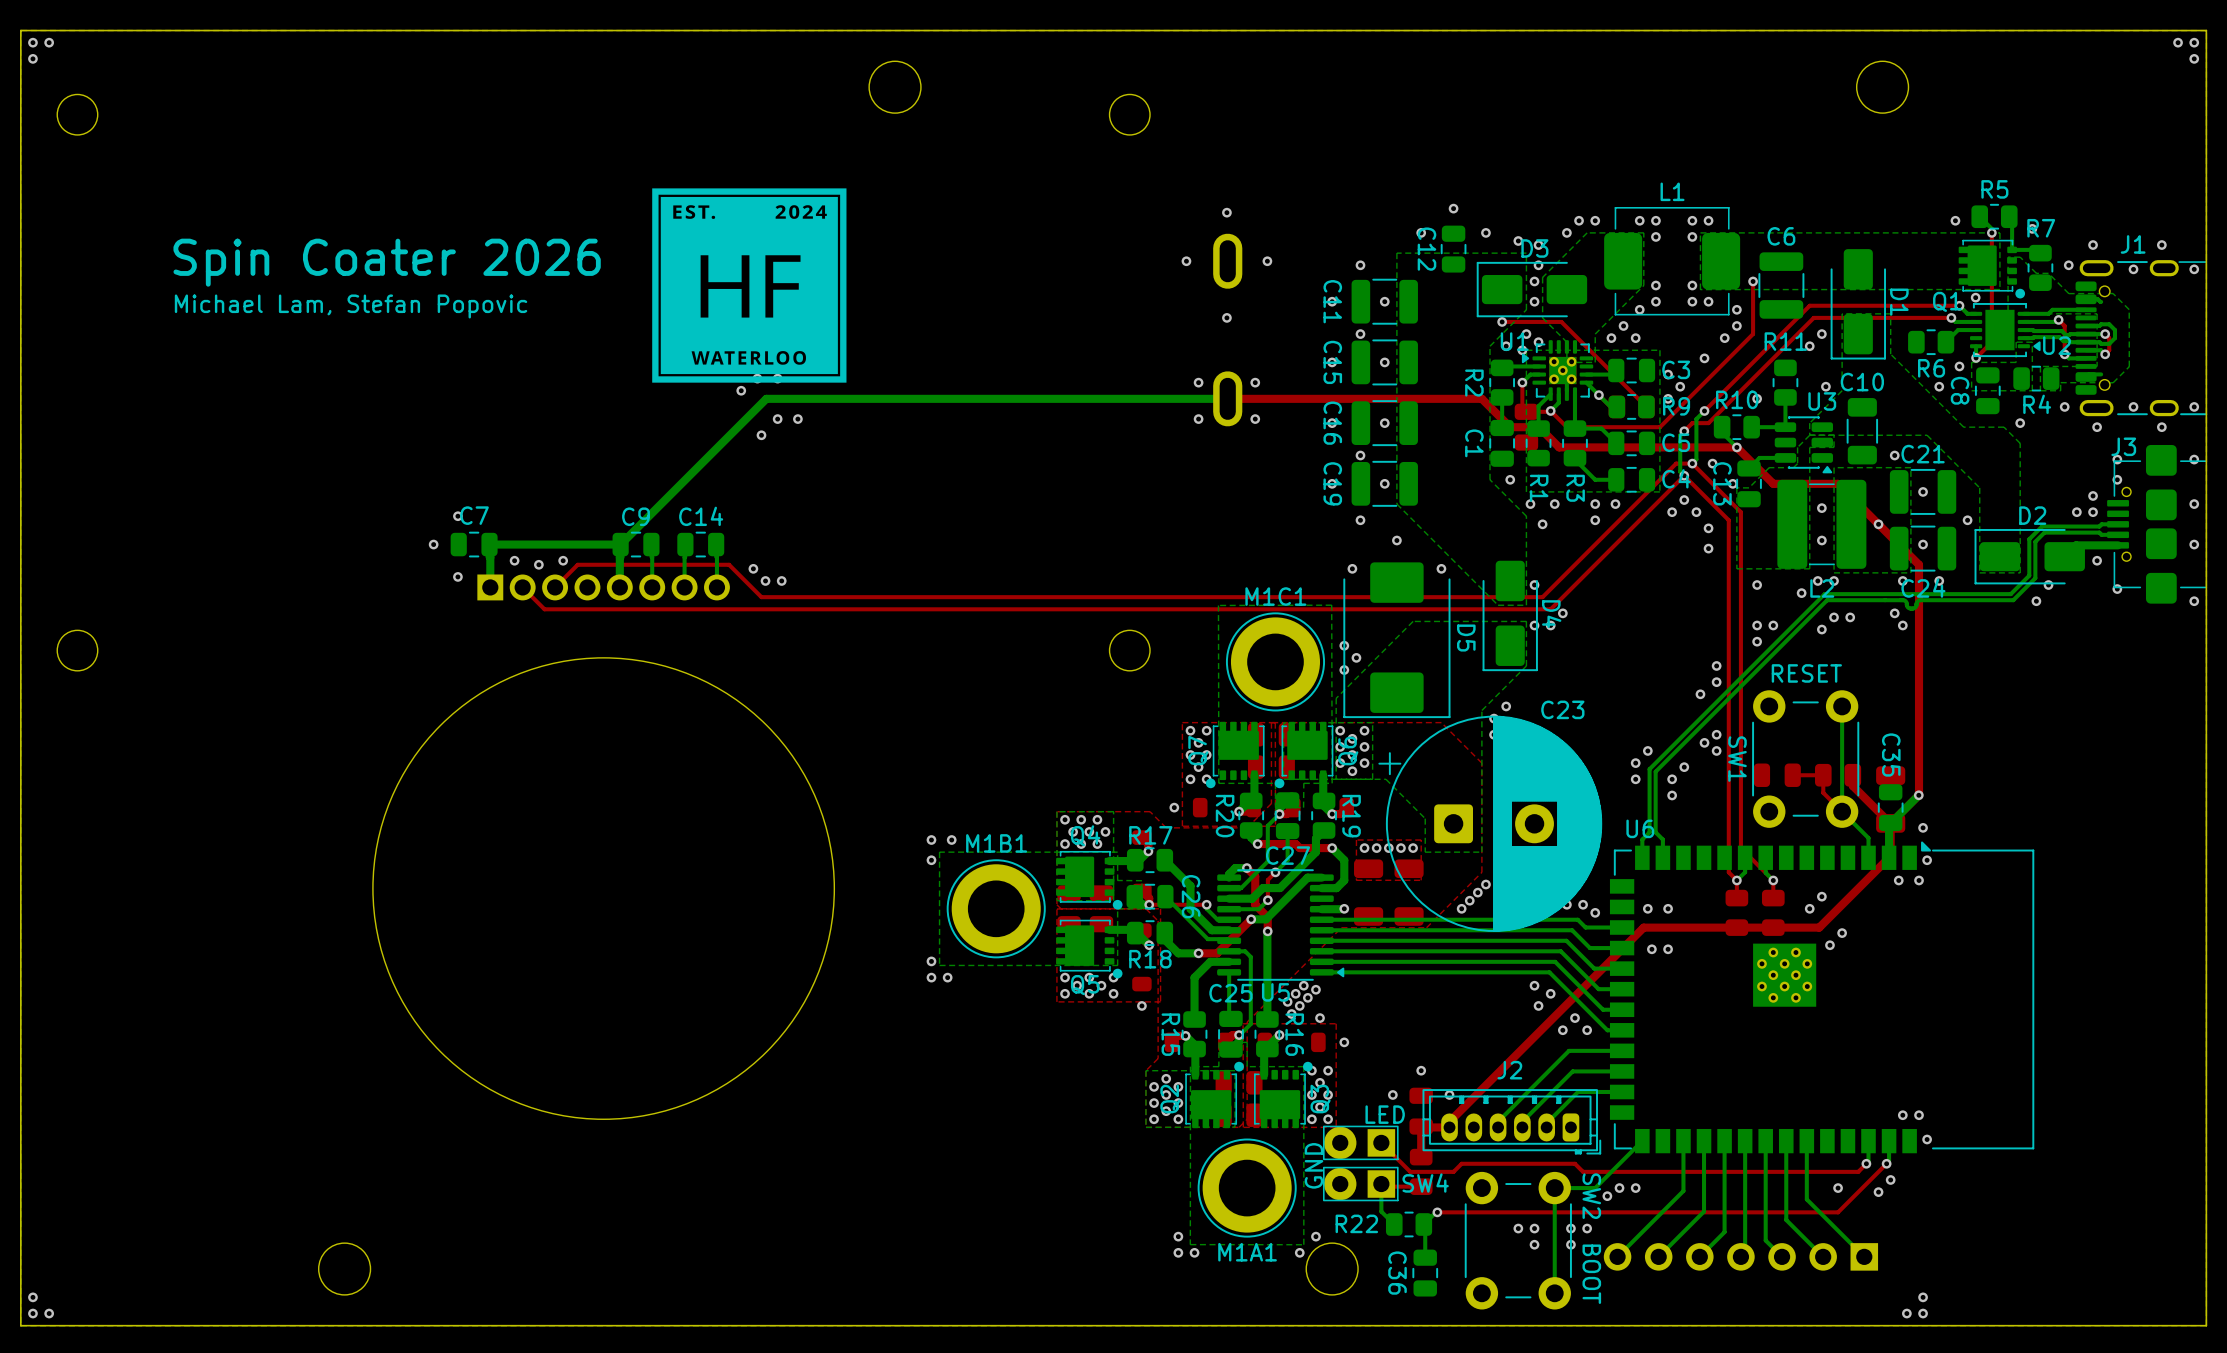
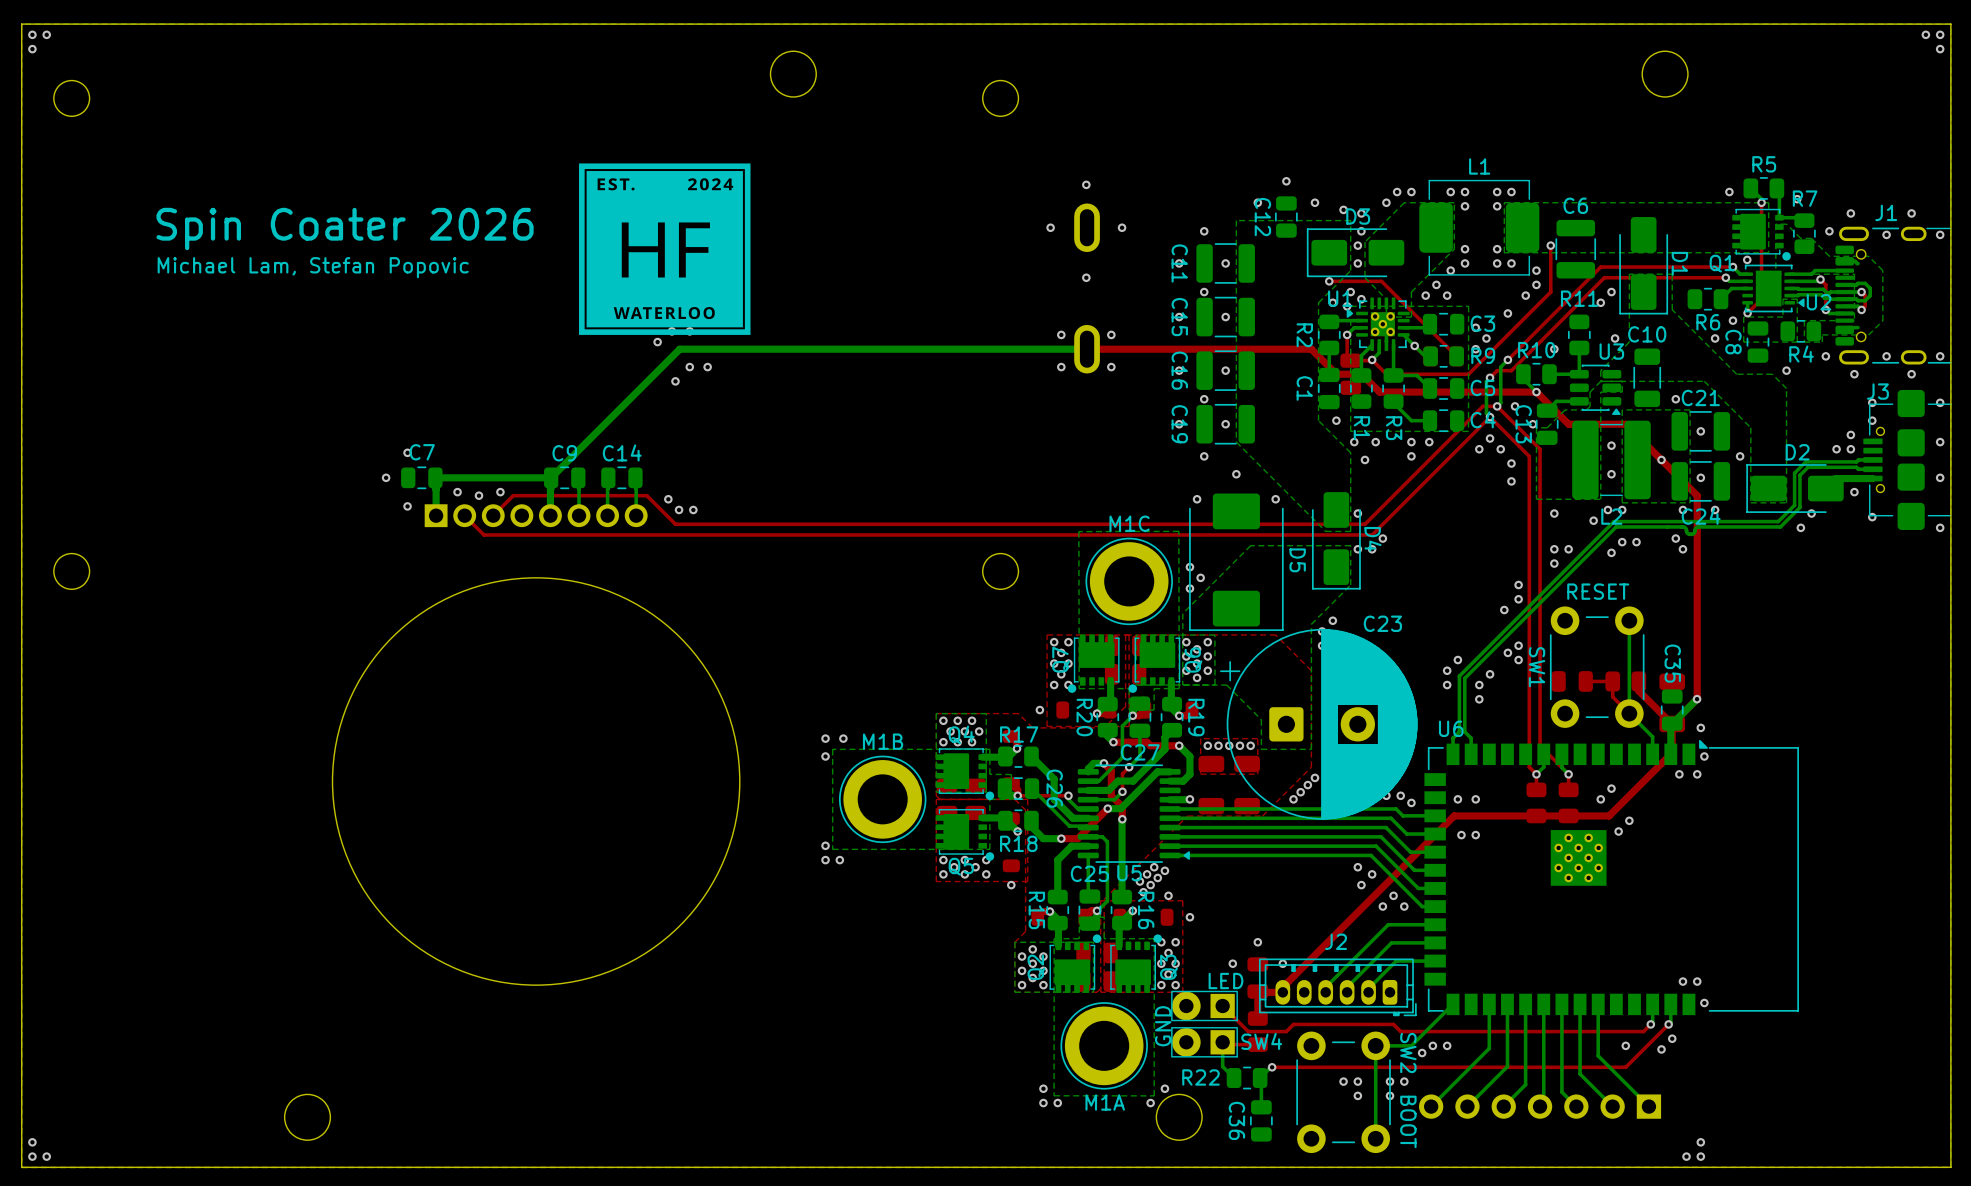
M1C1 name: M1C1 (1275, 596) -> M1C (1129, 523)
M1B1 name: M1B1 (996, 843) -> M1B (883, 741)
M1A1 name: M1A1 (1247, 1252) -> M1A (1105, 1102)

